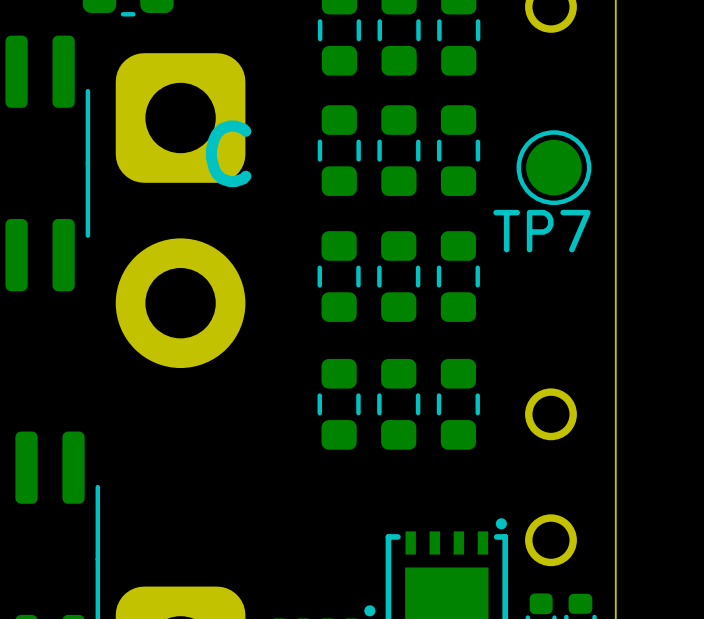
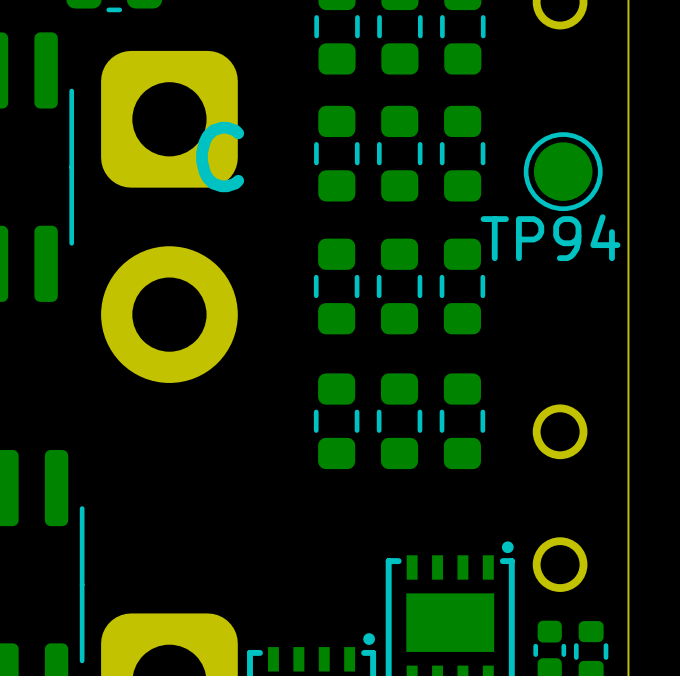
TP7 name: TP7 (541, 231) -> TP94 (550, 237)

